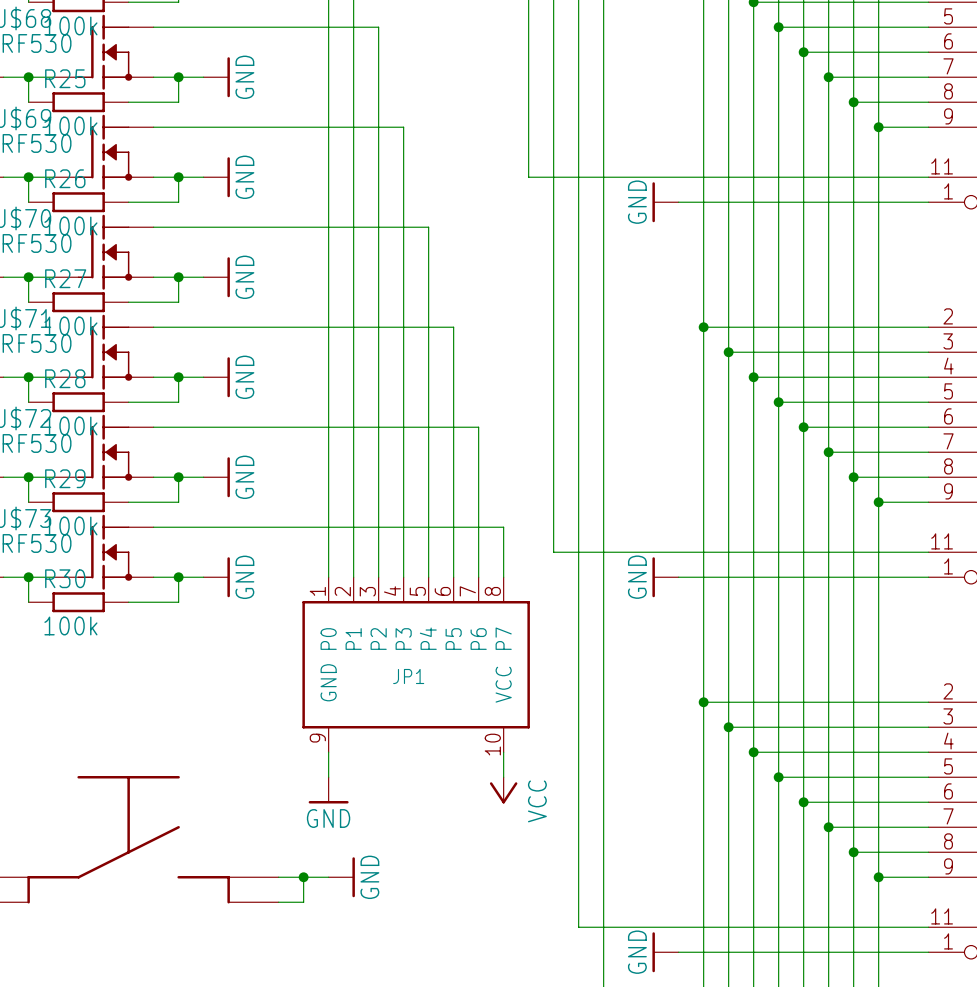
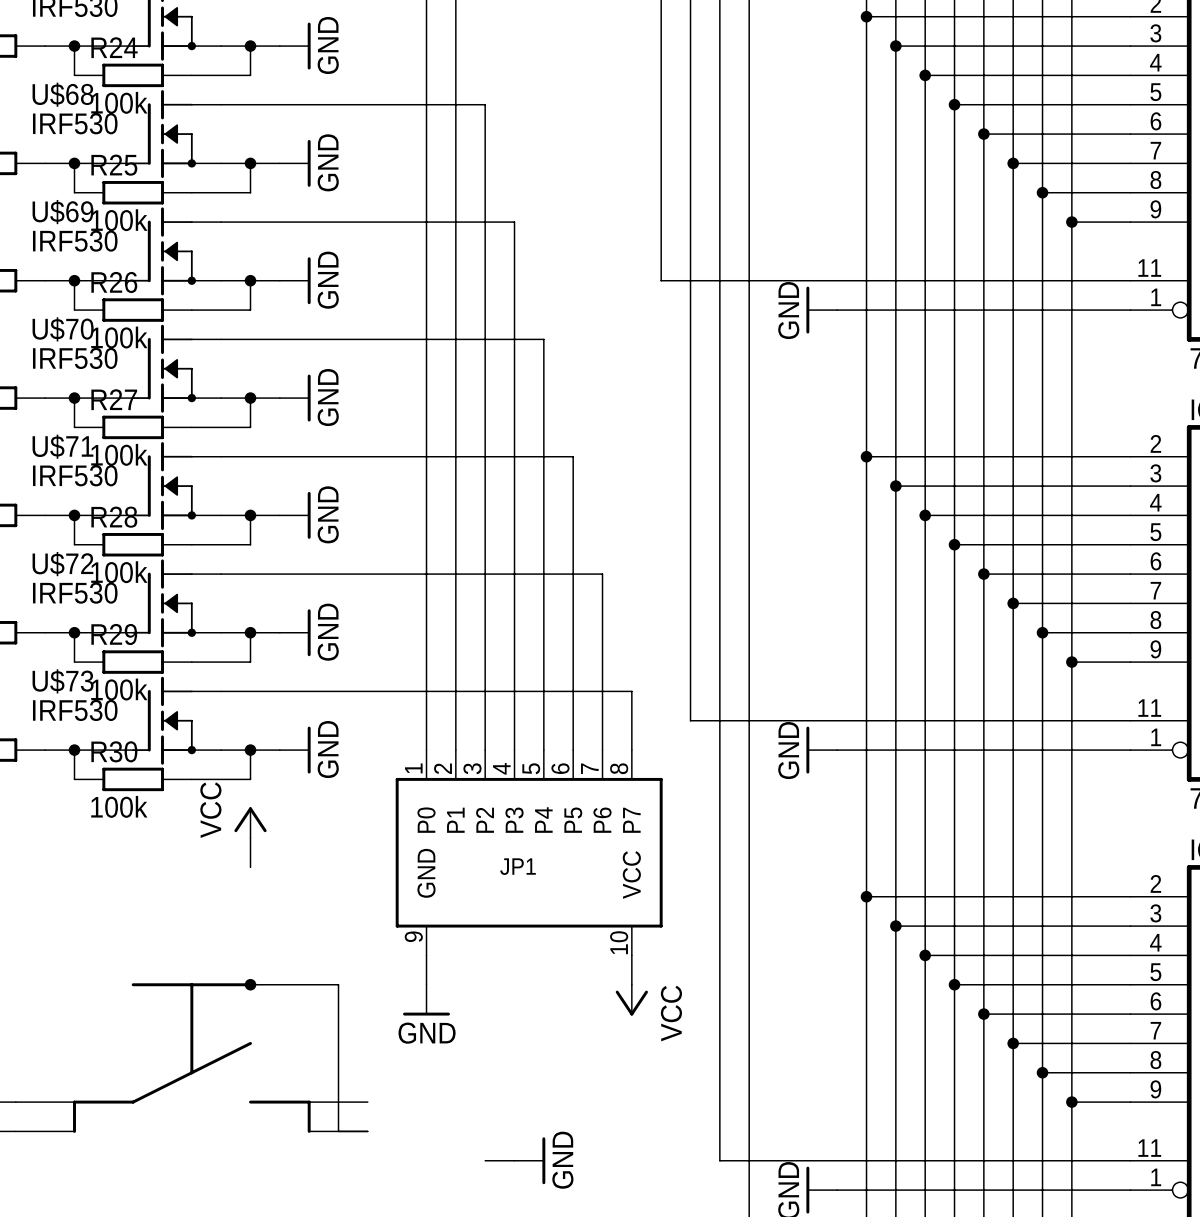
power symbol: none -> VCC (250, 822)
wire: none -> (250, 838) (250, 867)
junction: none -> (250, 984)
wire: (278, 877) (328, 877) -> none
wire: (303, 877) (303, 902) (278, 902) -> (221, 984) (338, 984) (338, 1131) (367, 1131)
junction: (303, 877) -> none
power symbol position: GND (341, 877) -> GND (529, 1160)
wire: none -> (485, 1160) (514, 1160)

